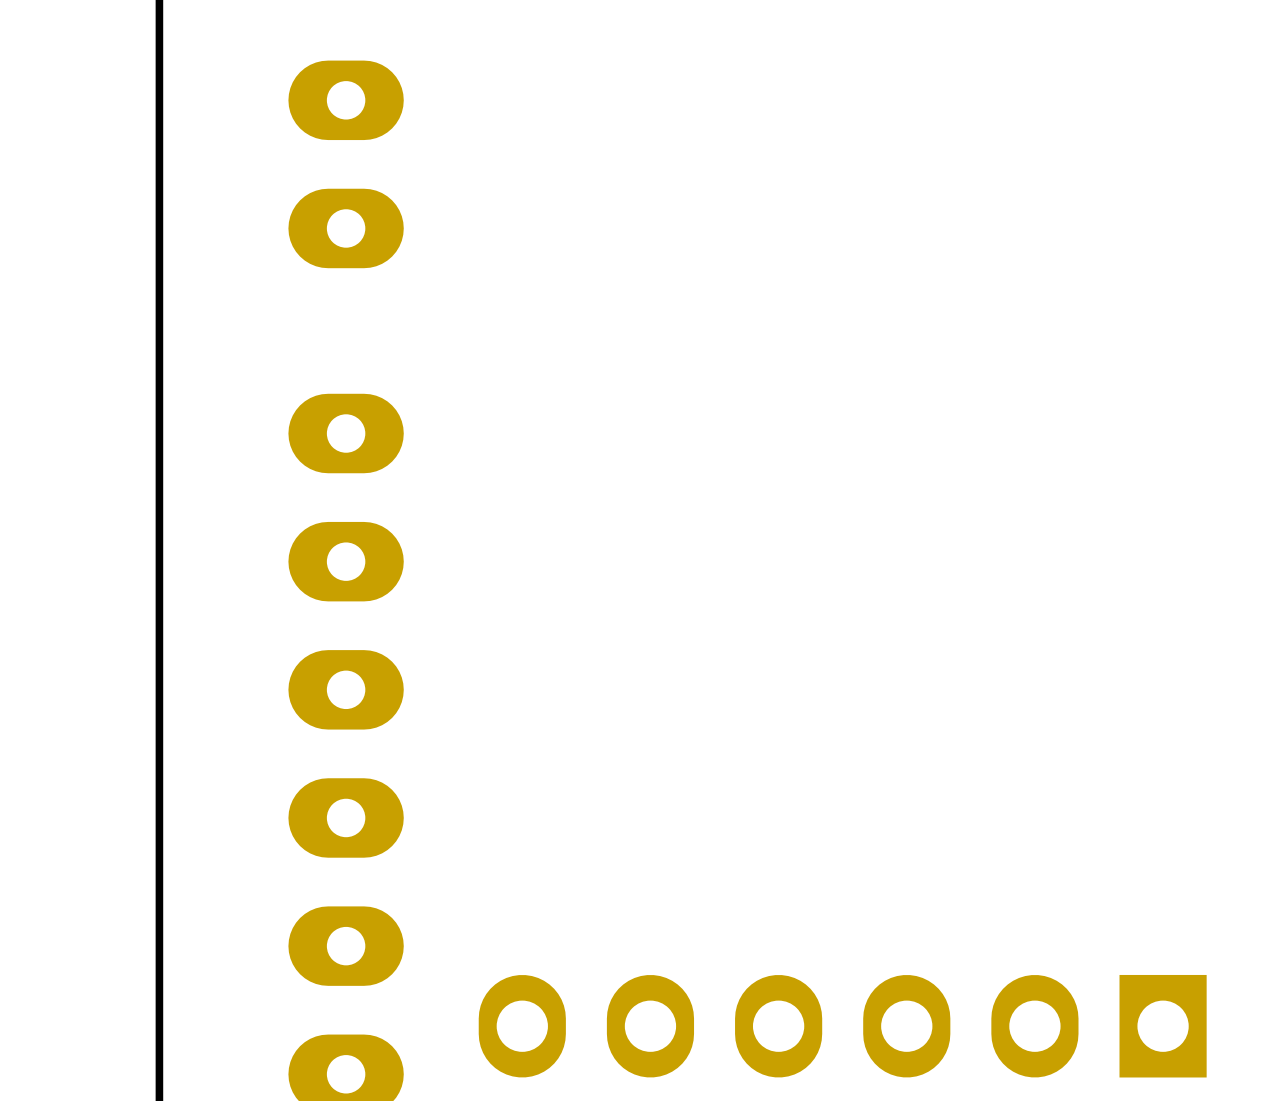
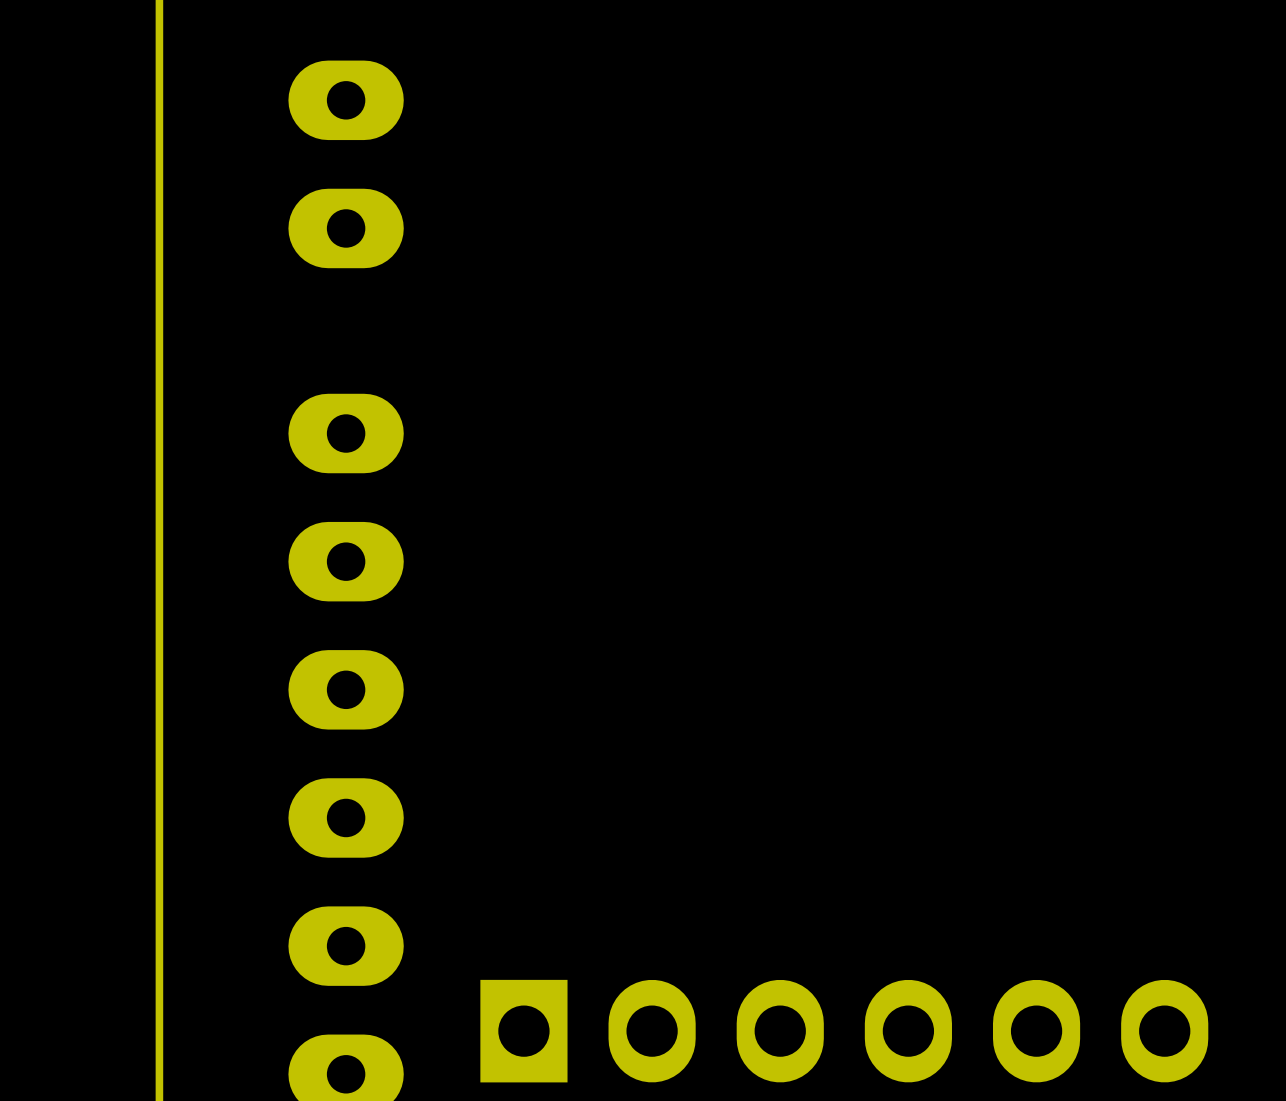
part rotation: 0° (842, 1026) -> 180° (844, 1031)

